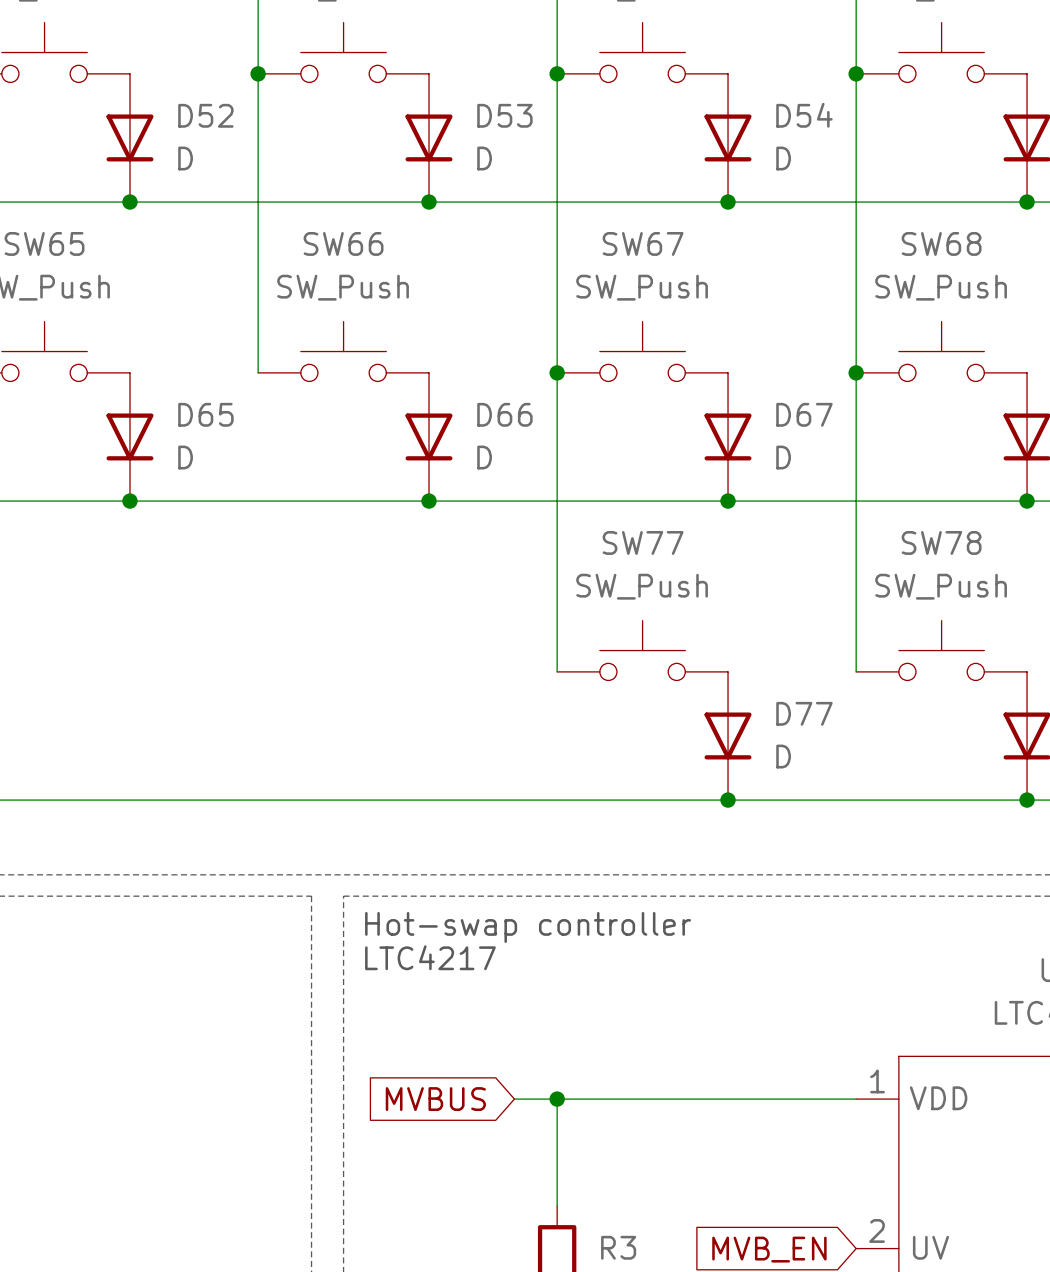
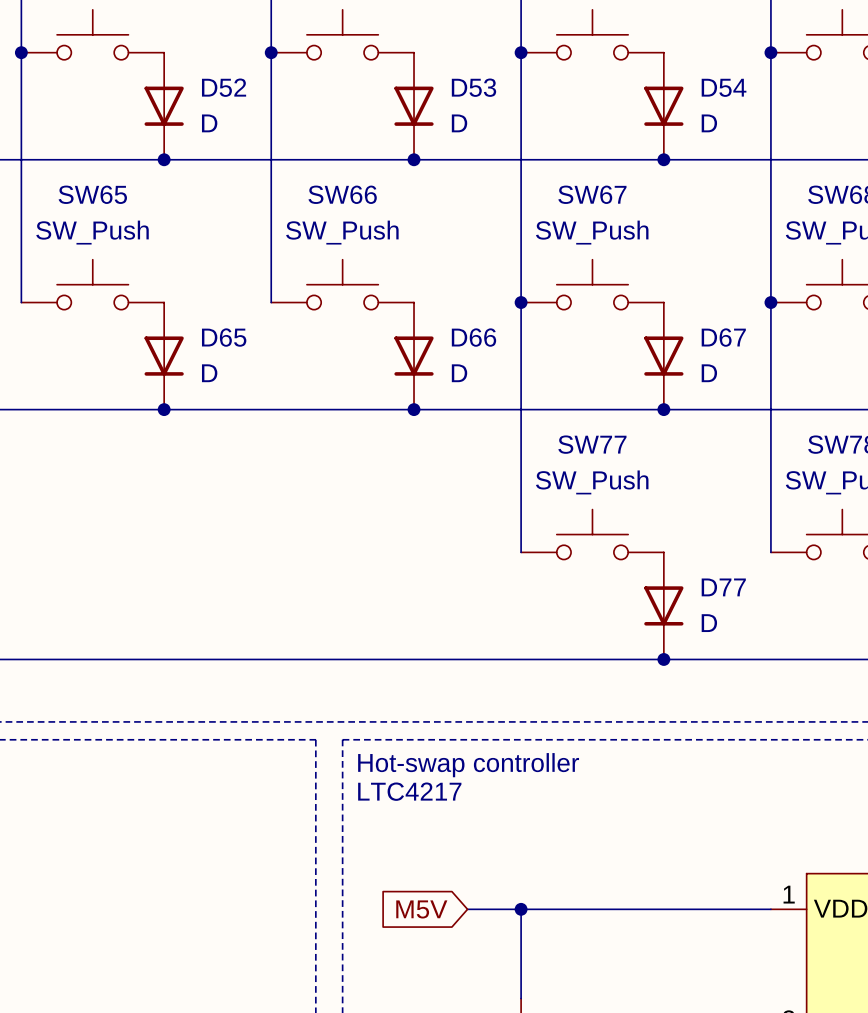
global label: MVBUS (435, 1099) -> none
global label: none -> M5V (421, 909)
wire: none -> (467, 909) (485, 909)

